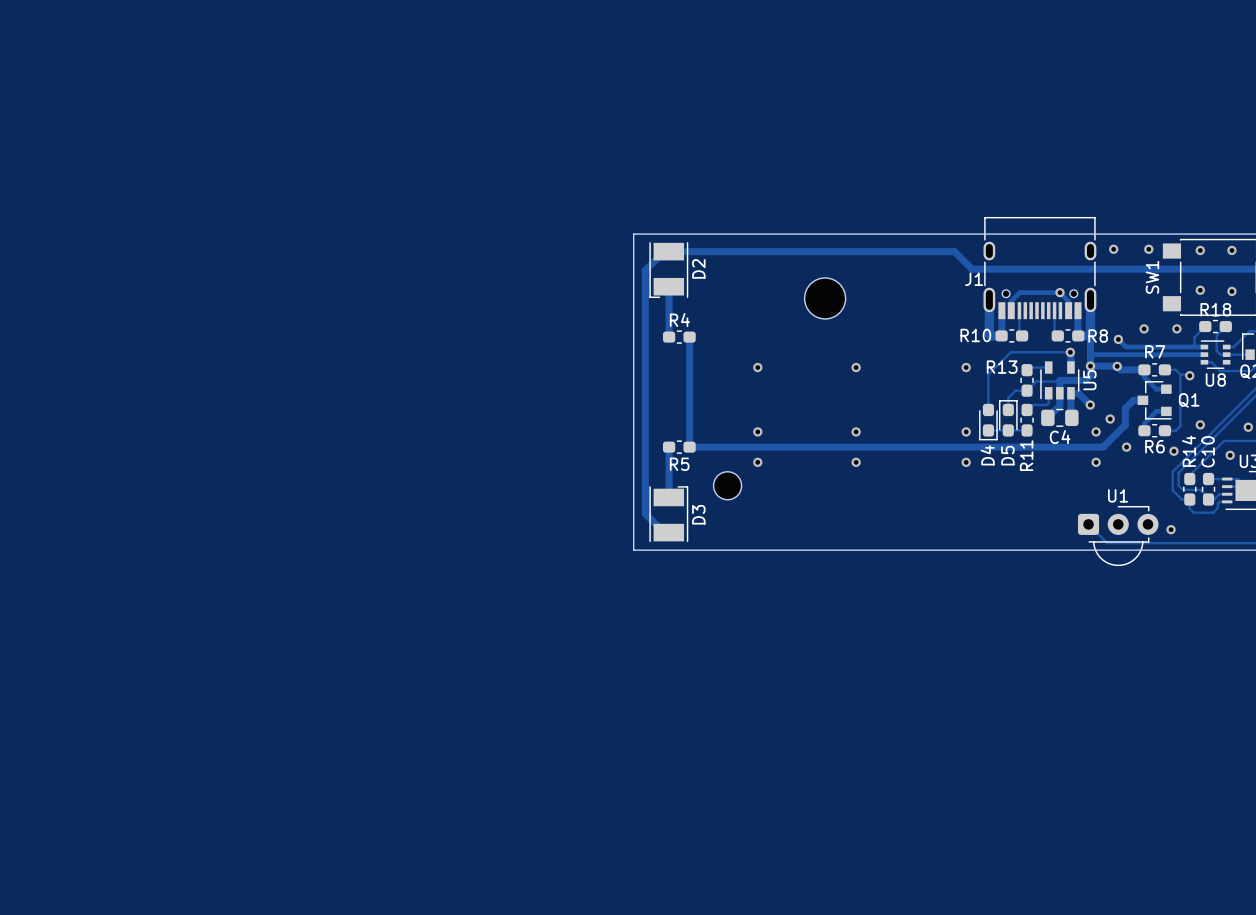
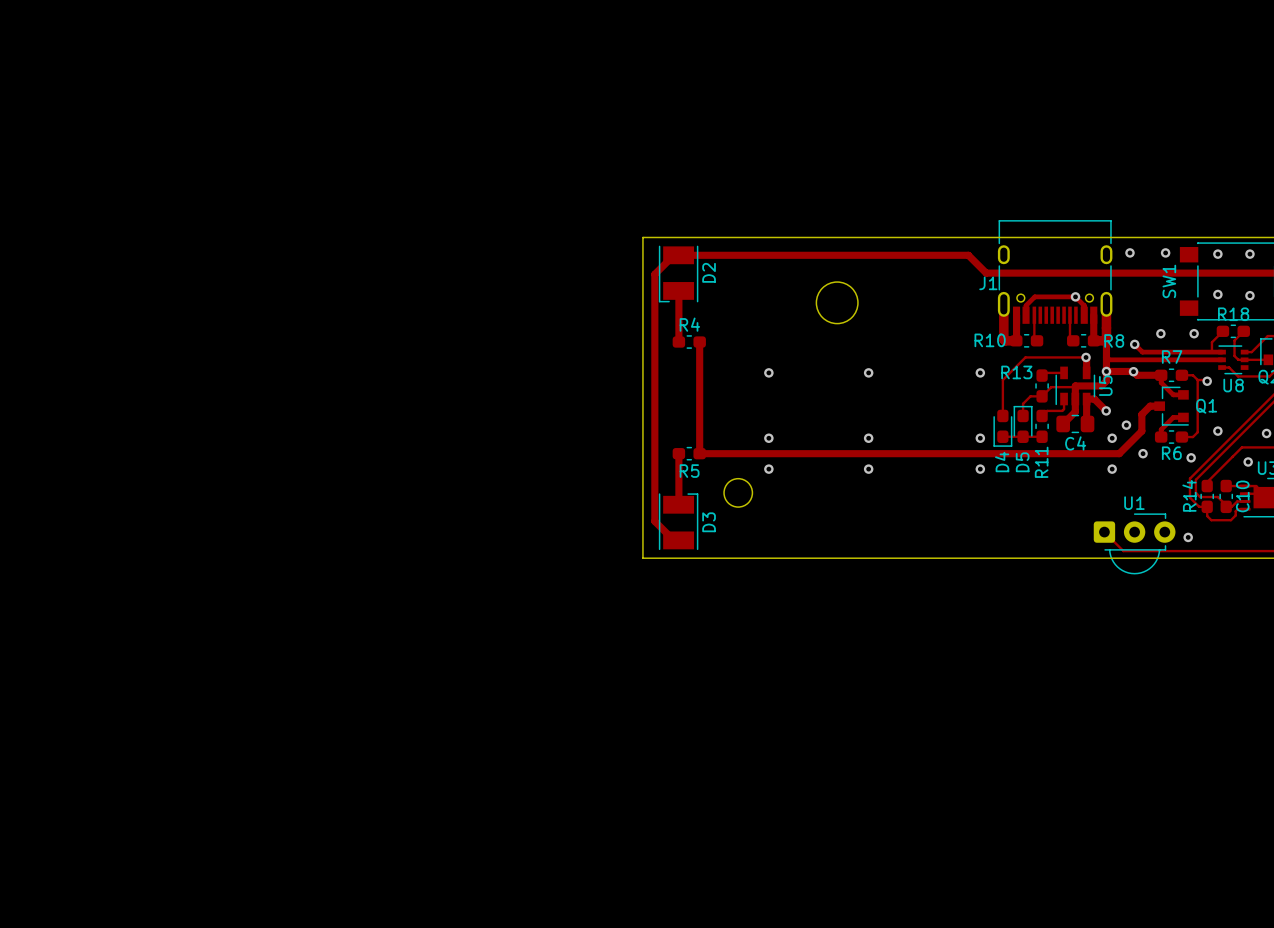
R14 name position: R14 (1189, 451) -> R14 (1189, 495)
C10 name position: C10 (1208, 451) -> C10 (1242, 496)

